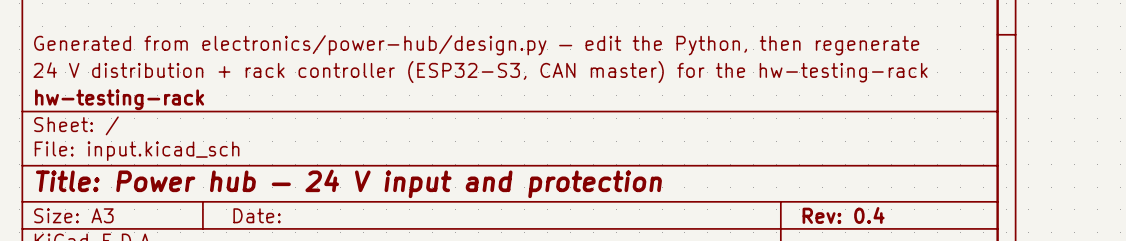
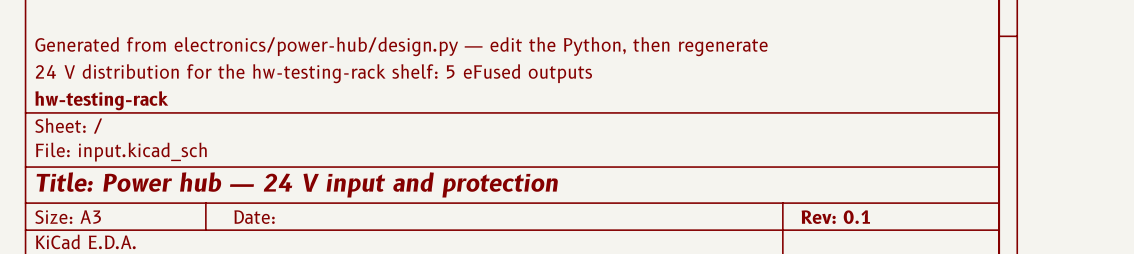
title block: 24 V distribution + rack controller (ESP32-S3, CAN master) for the hw-testing-rack (480, 72) -> 24 V distribution for the hw-testing-rack shelf: 5 eFused outputs (313, 73)
title block: Rev: 0.4 (843, 215) -> Rev: 0.1 (835, 217)

